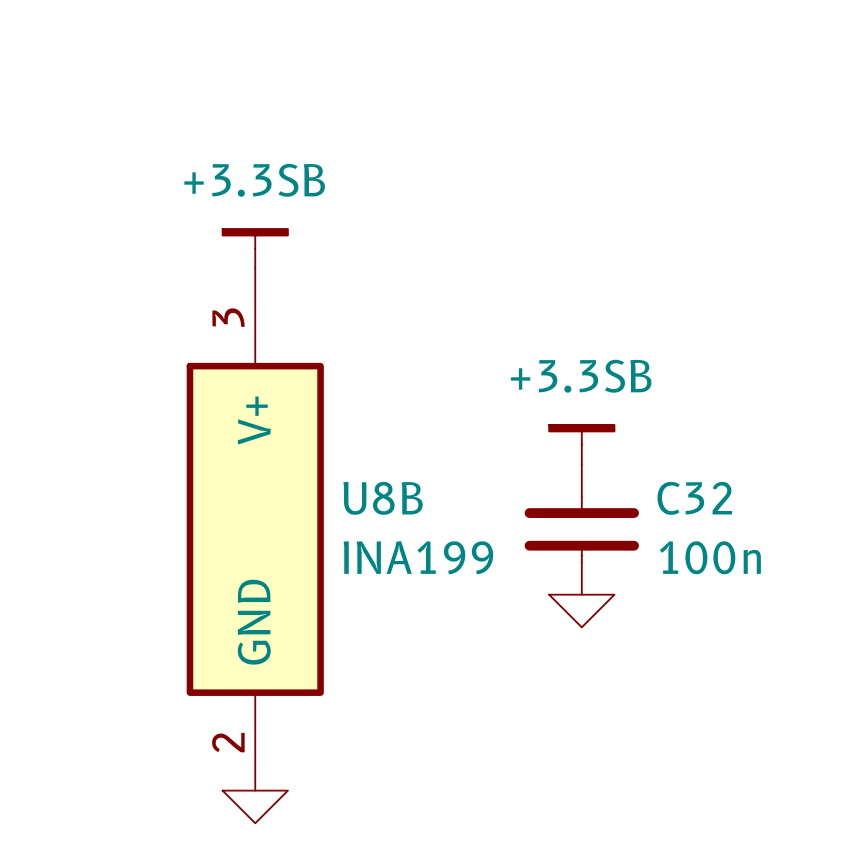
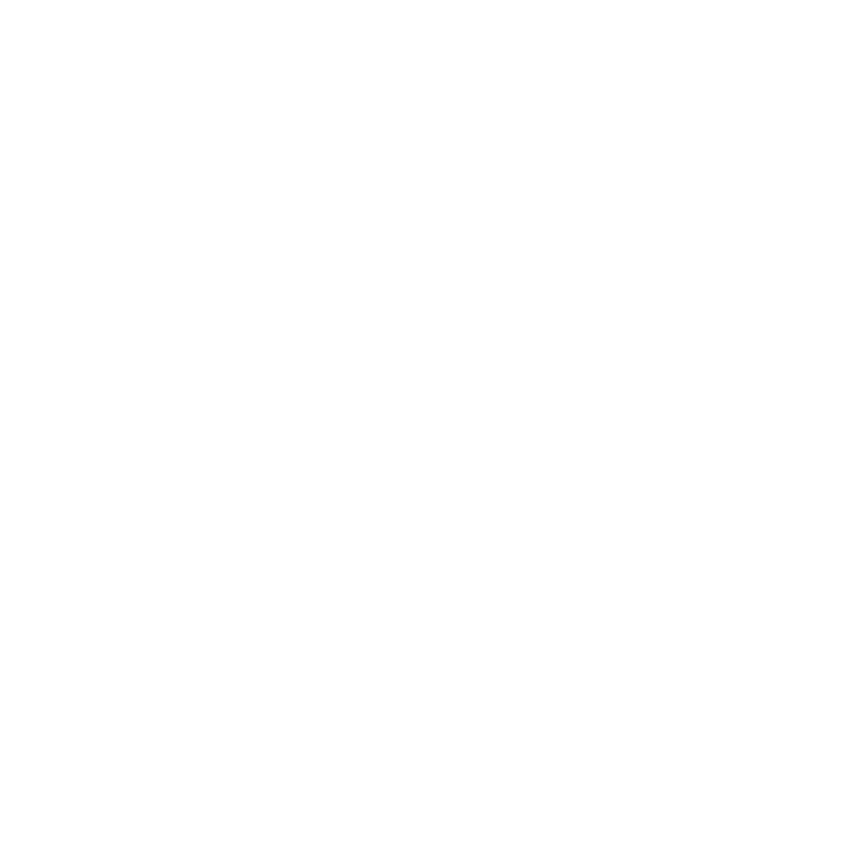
power symbol: +3.3SB (255, 248) -> none
power symbol: +3.3SB (581, 444) -> none
U8B: INA199 (255, 529) -> none
C32: 100n (581, 529) -> none
power symbol: (581, 611) -> none
power symbol: (255, 806) -> none

